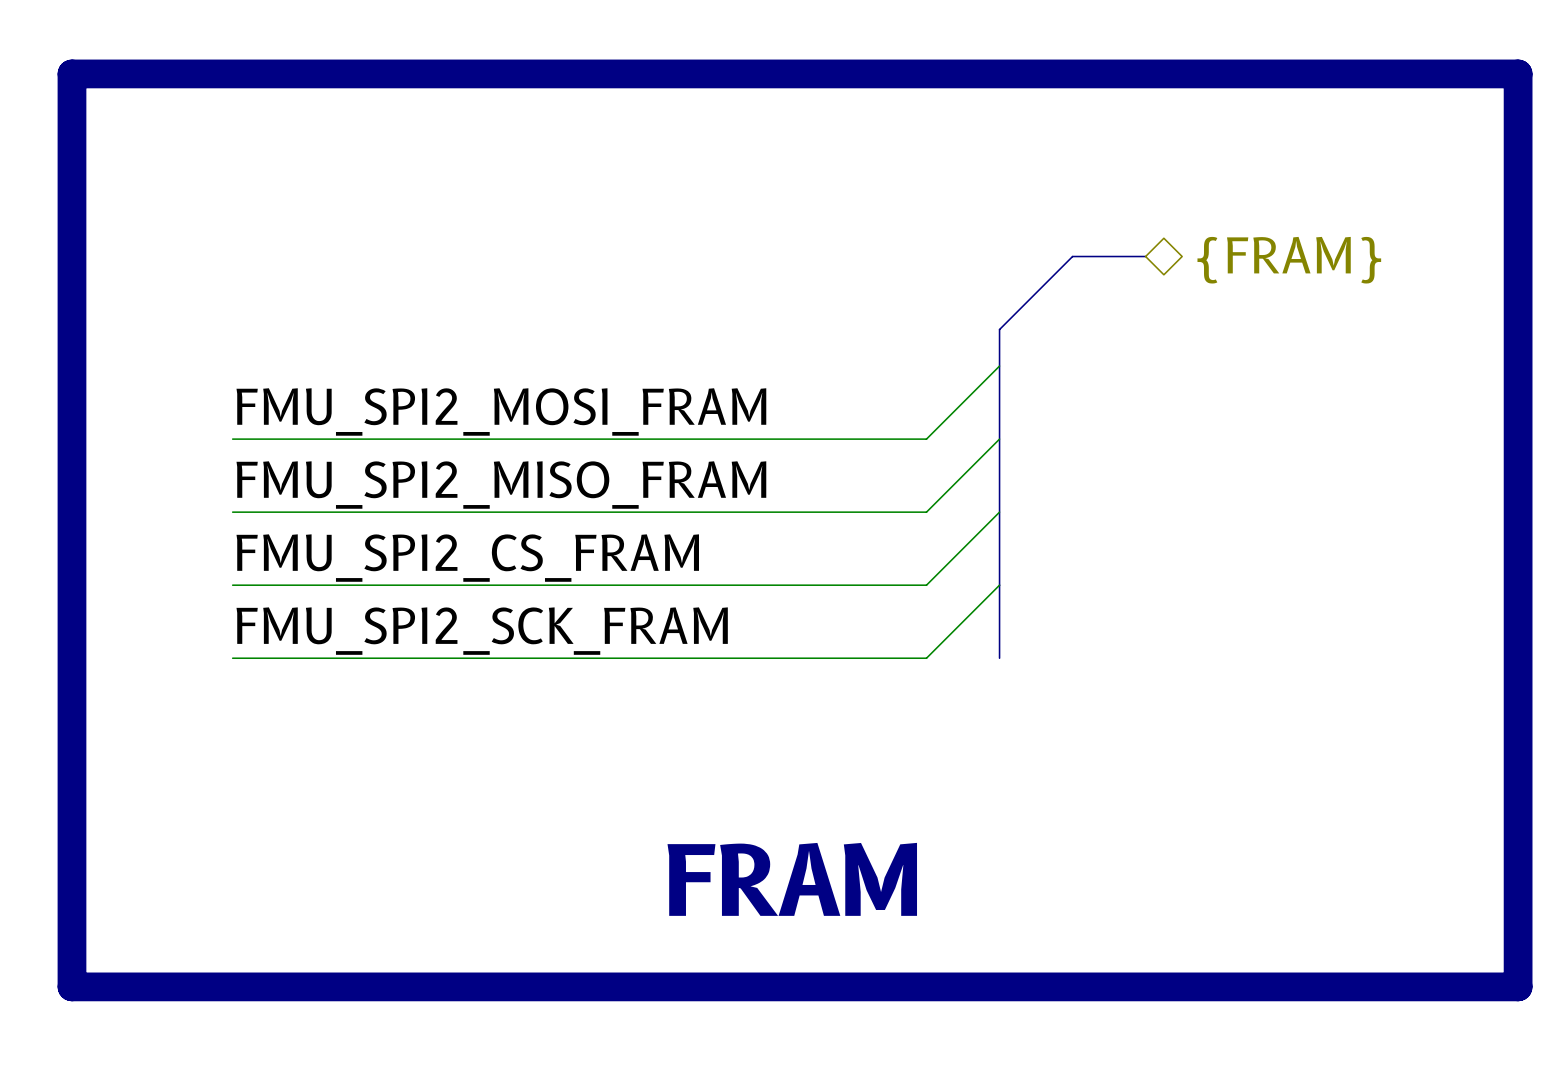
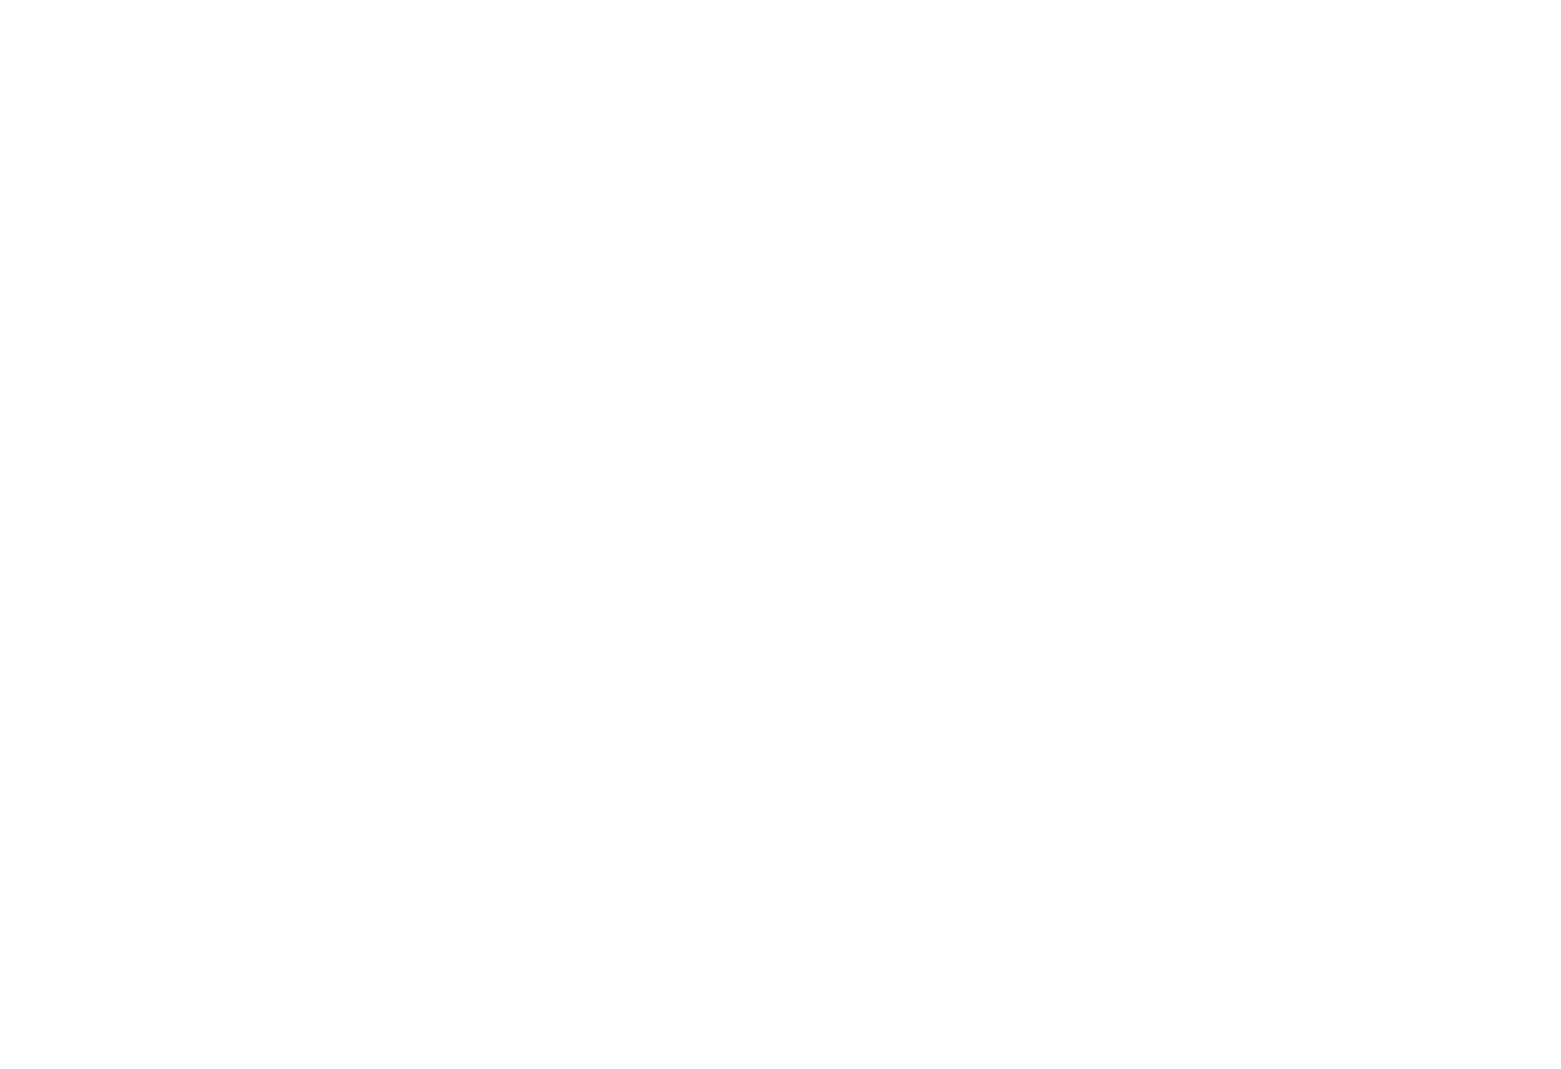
line: (71, 73) (1518, 73) (1518, 986) (71, 986) (71, 73) -> none
bus: (1145, 256) (1072, 256) (999, 329) (999, 658) -> none
hierarchical label: {FRAM} (1289, 260) -> none
wire: (999, 366) (926, 439) (232, 439) -> none
label: FMU_SPI2_MOSI_FRAM (501, 411) -> none
wire: (999, 439) (926, 512) (232, 512) -> none
label: FMU_SPI2_MISO_FRAM (501, 485) -> none
wire: (999, 512) (926, 585) (232, 585) -> none
label: FMU_SPI2_CS_FRAM (467, 558) -> none
wire: (999, 585) (926, 658) (232, 658) -> none
label: FMU_SPI2_SCK_FRAM (482, 631) -> none
text: FRAM (792, 879) -> none

